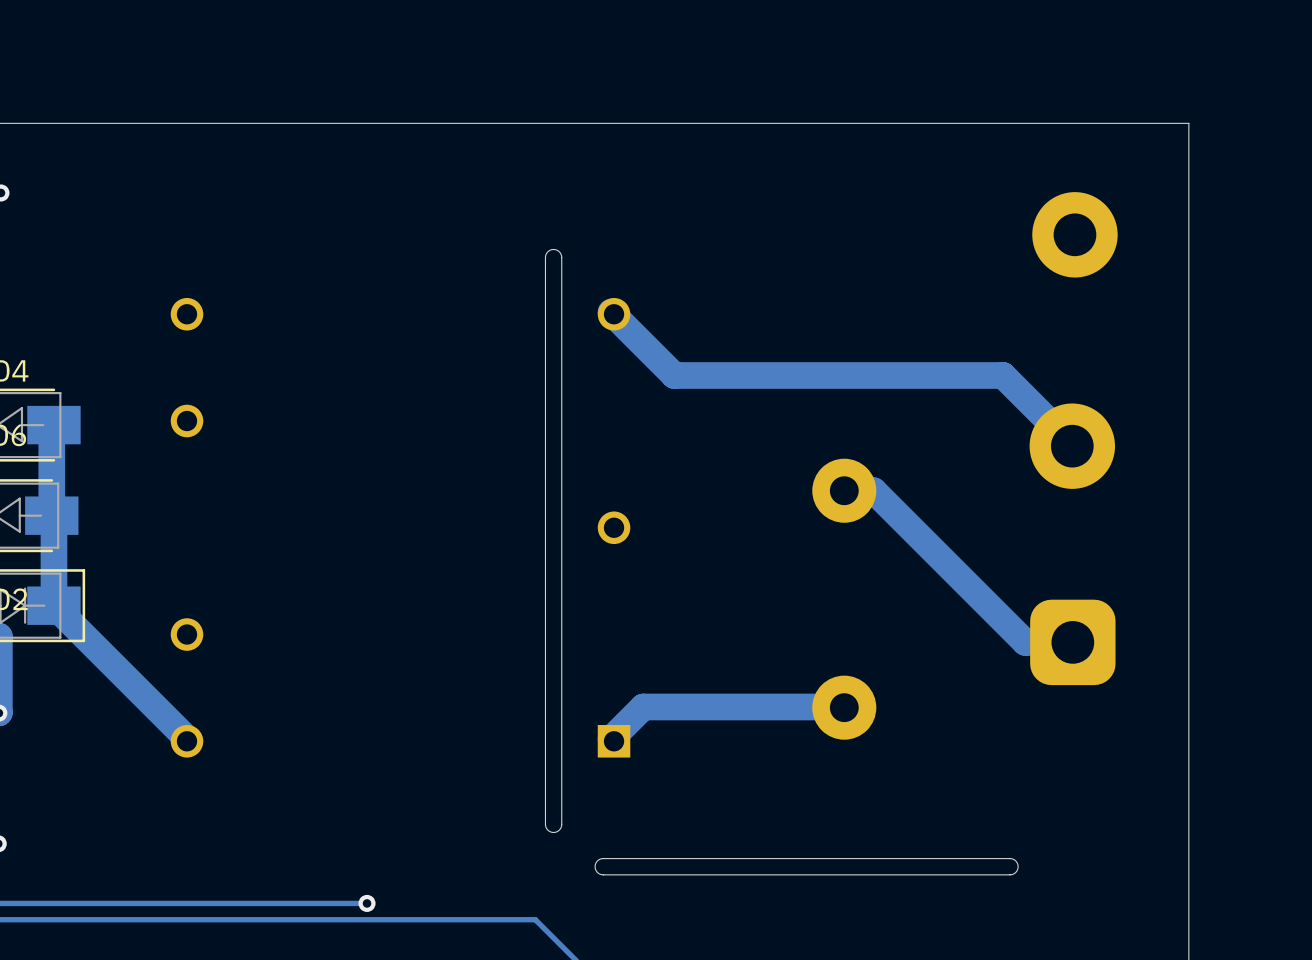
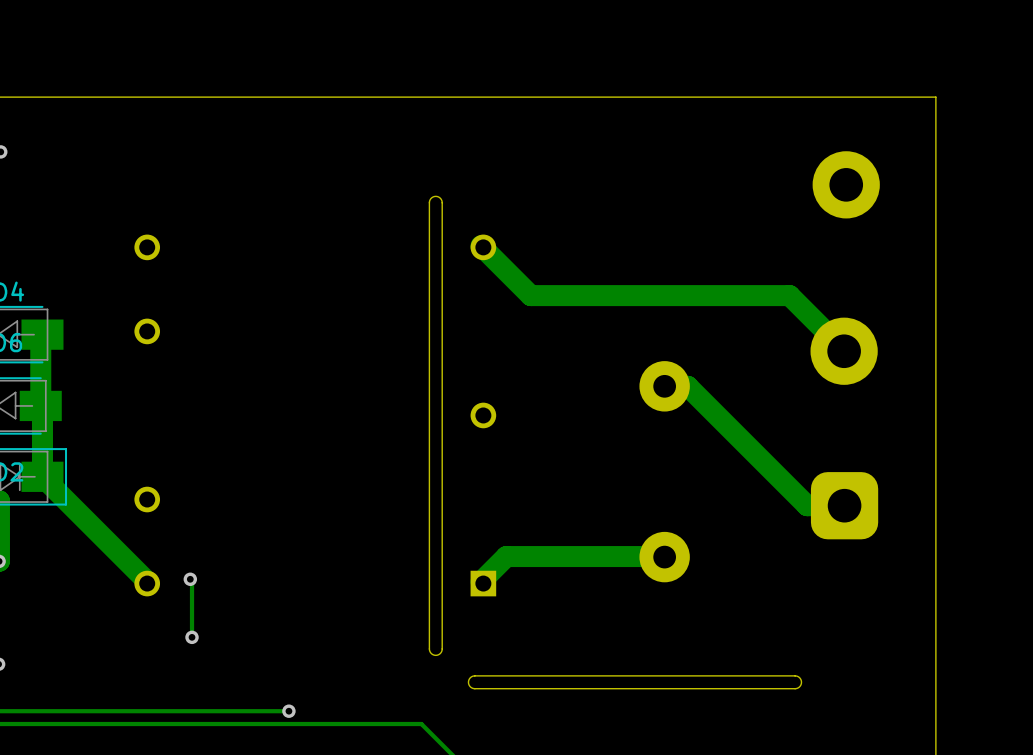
track: none -> (190, 579) (192, 580) (192, 637)
via: none -> (190, 579)
via: none -> (192, 637)

